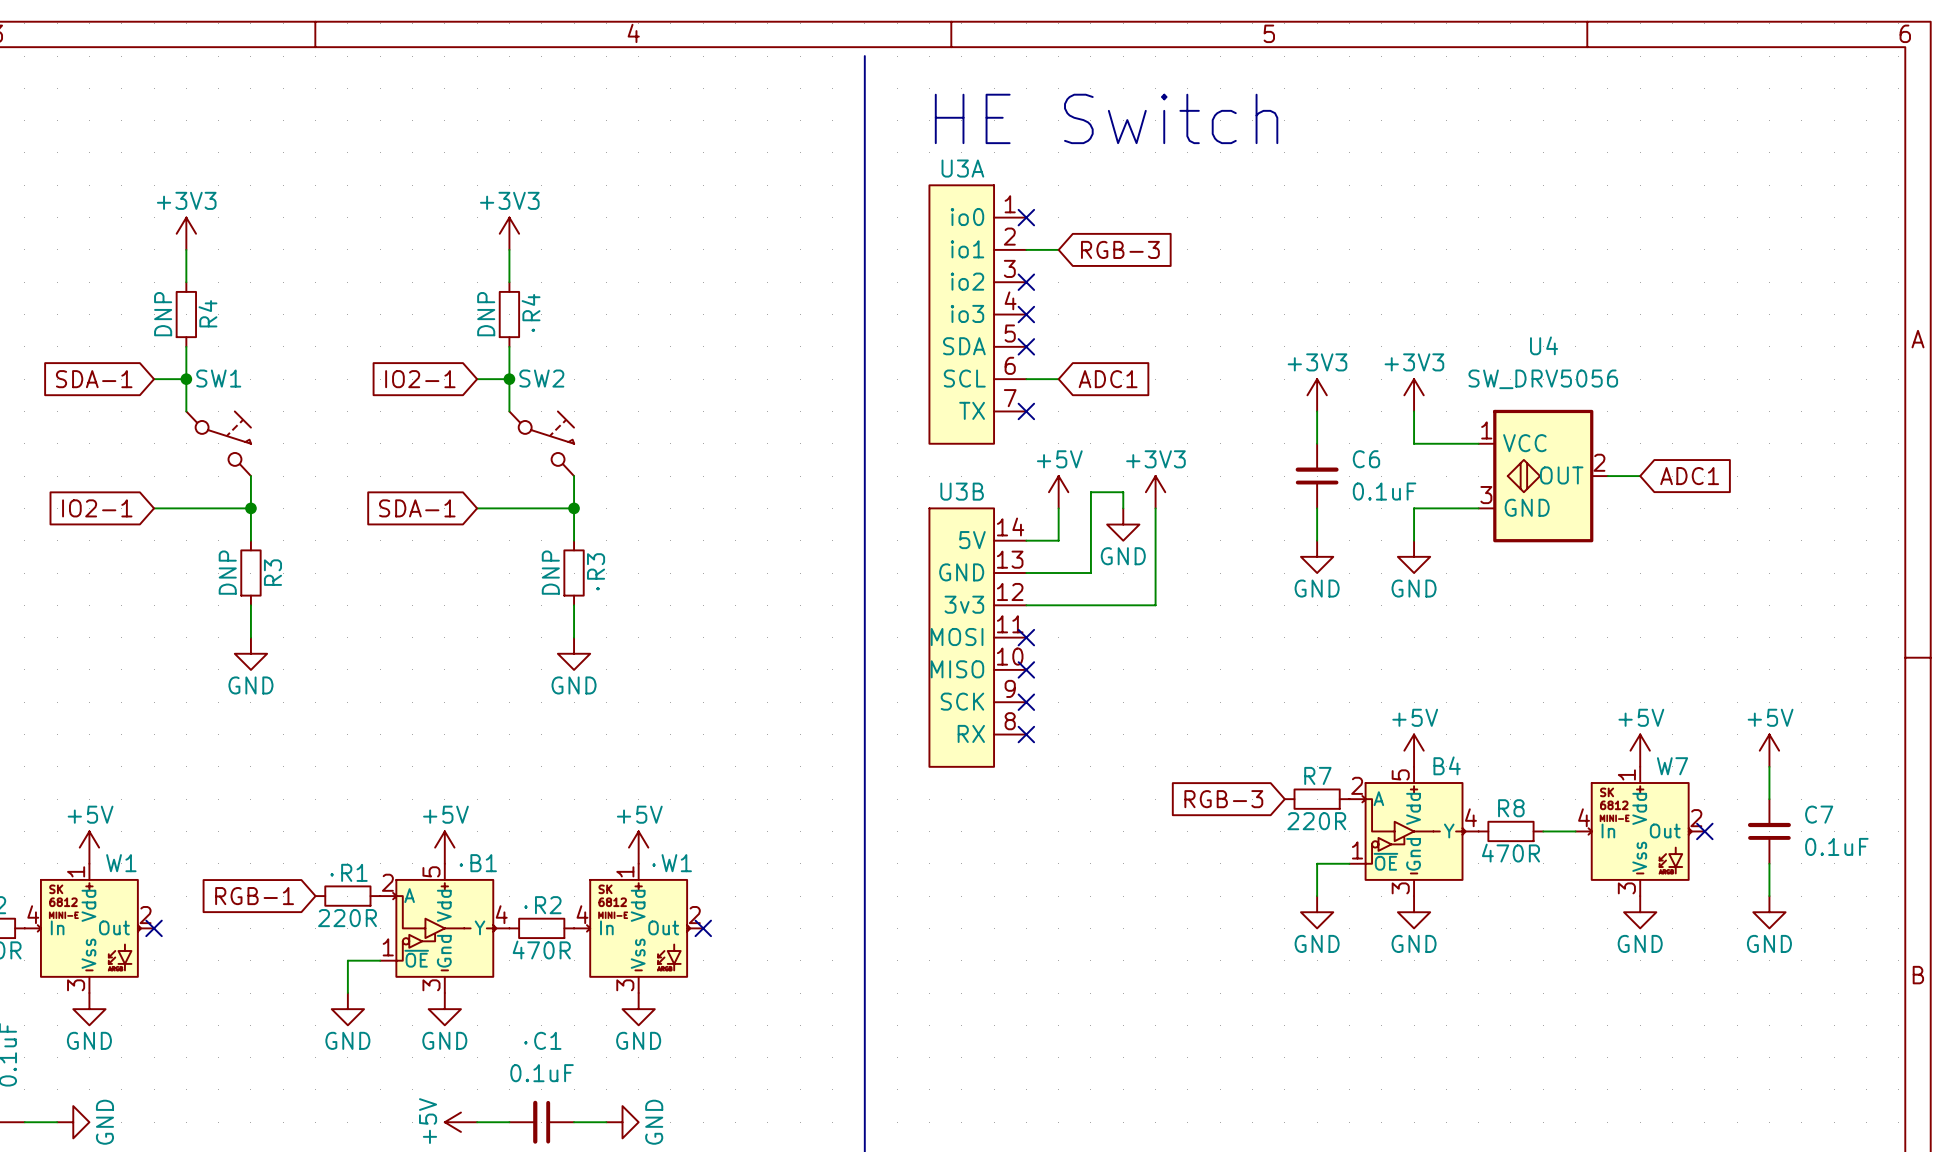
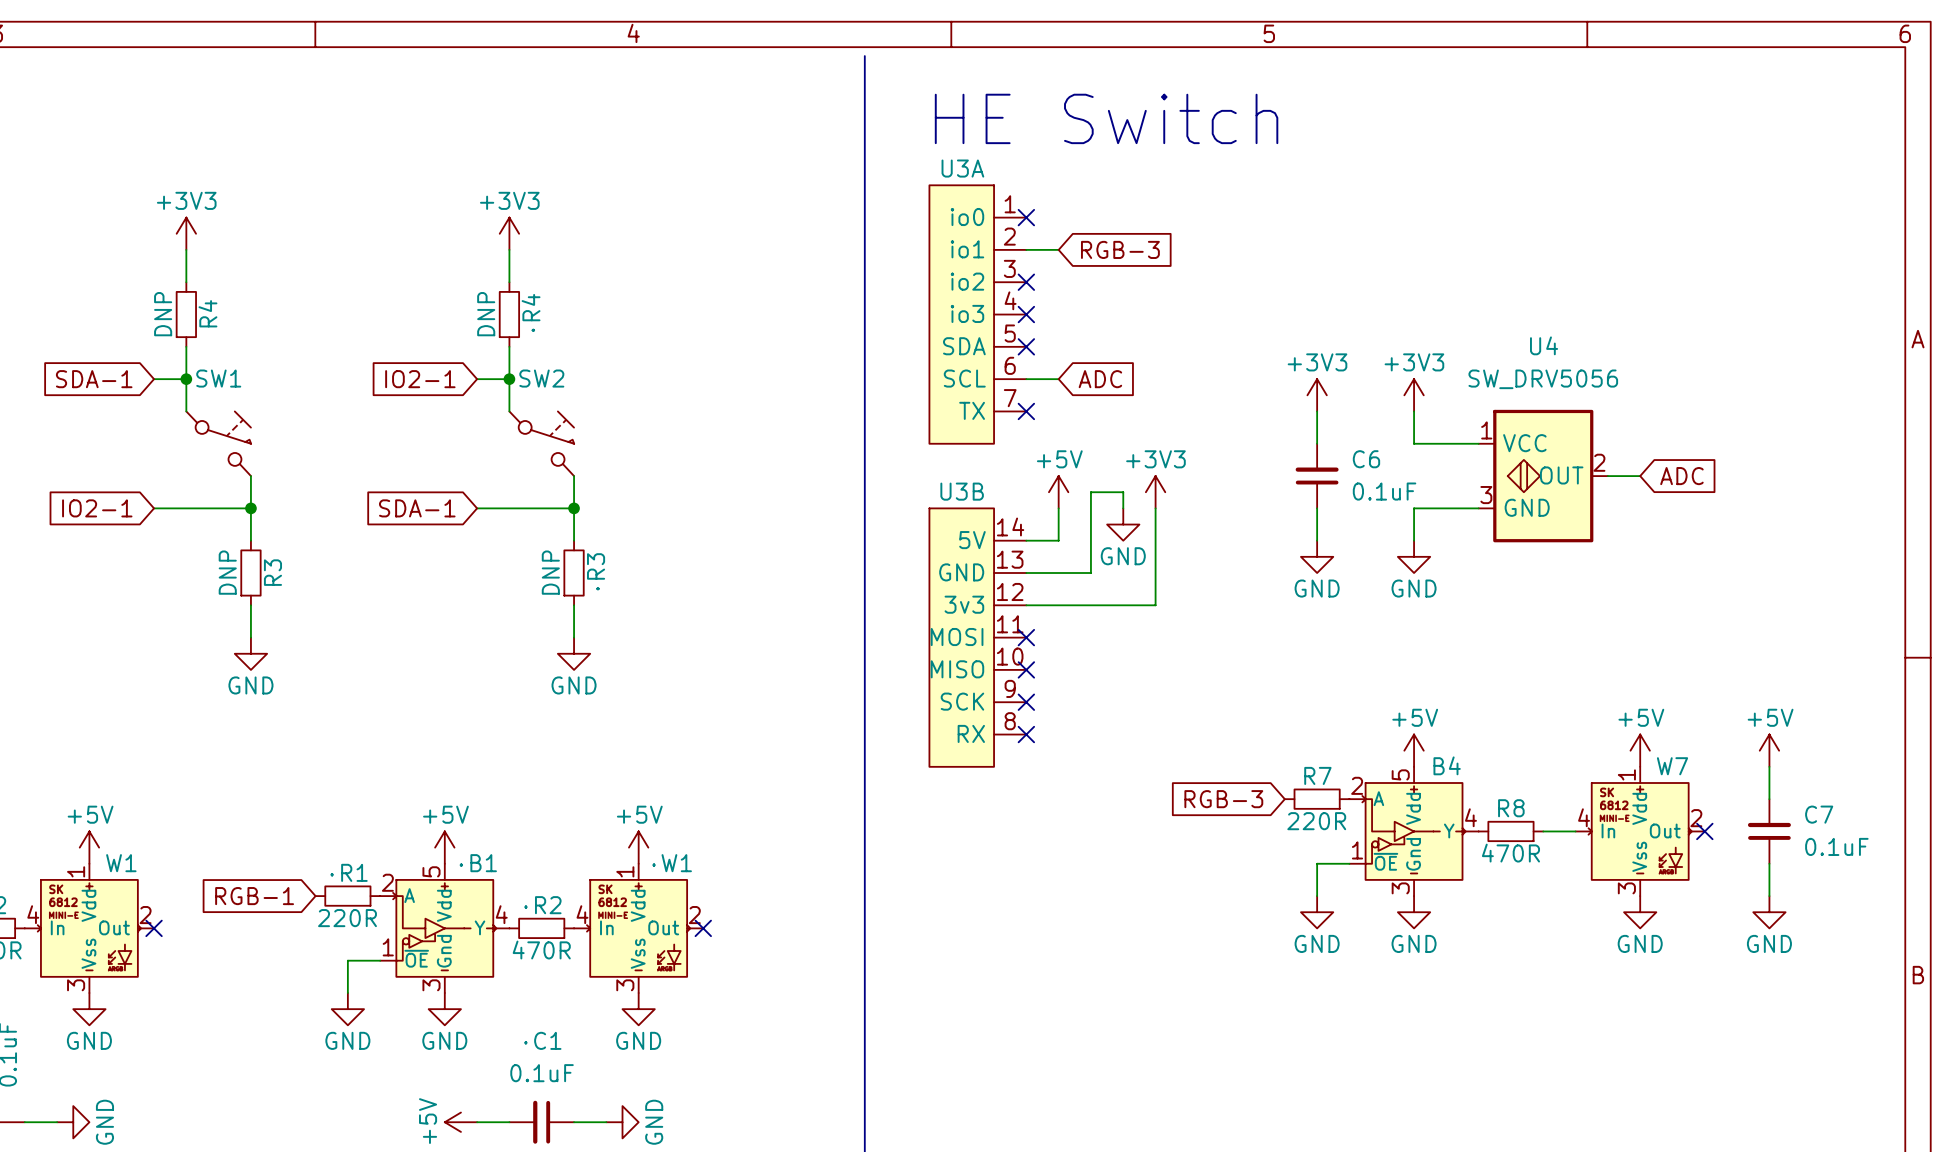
global label: ADC1 (1108, 379) -> ADC (1100, 379)
global label: ADC1 (1689, 476) -> ADC (1681, 476)

